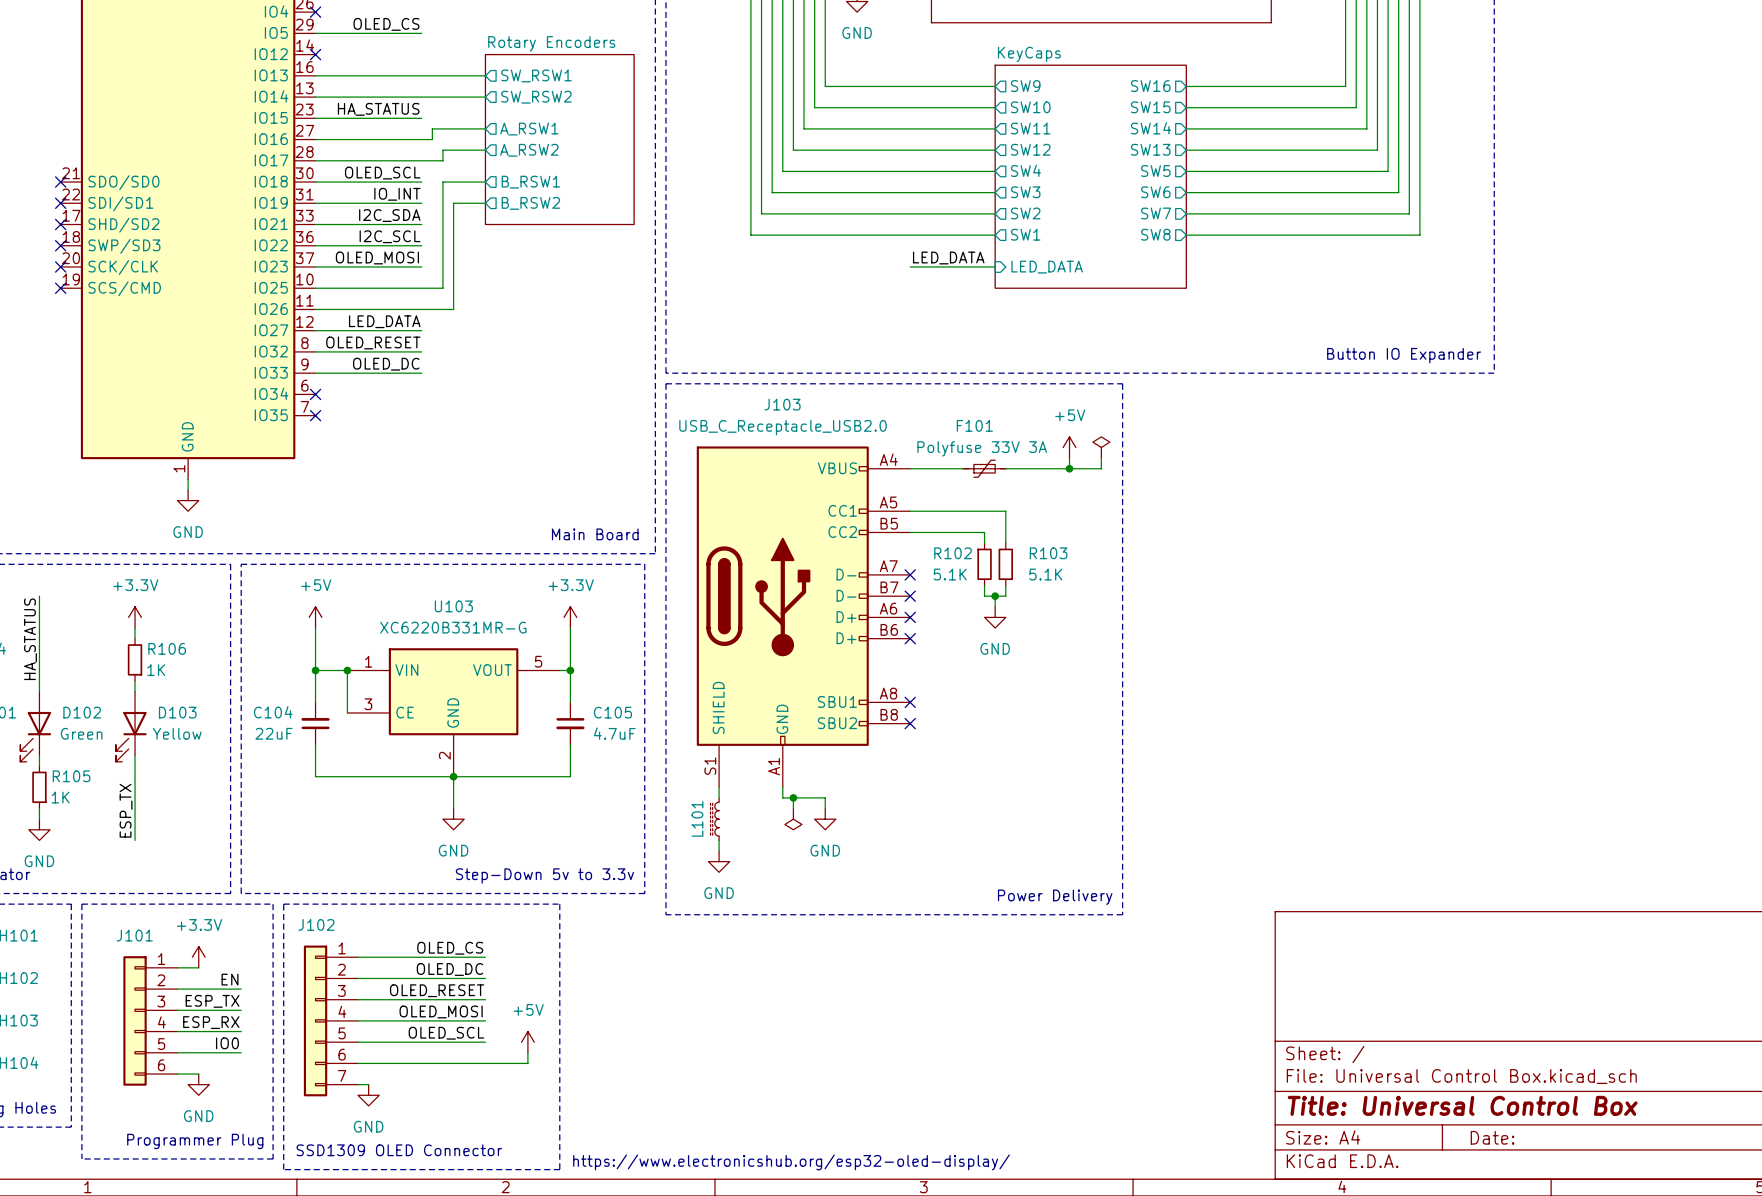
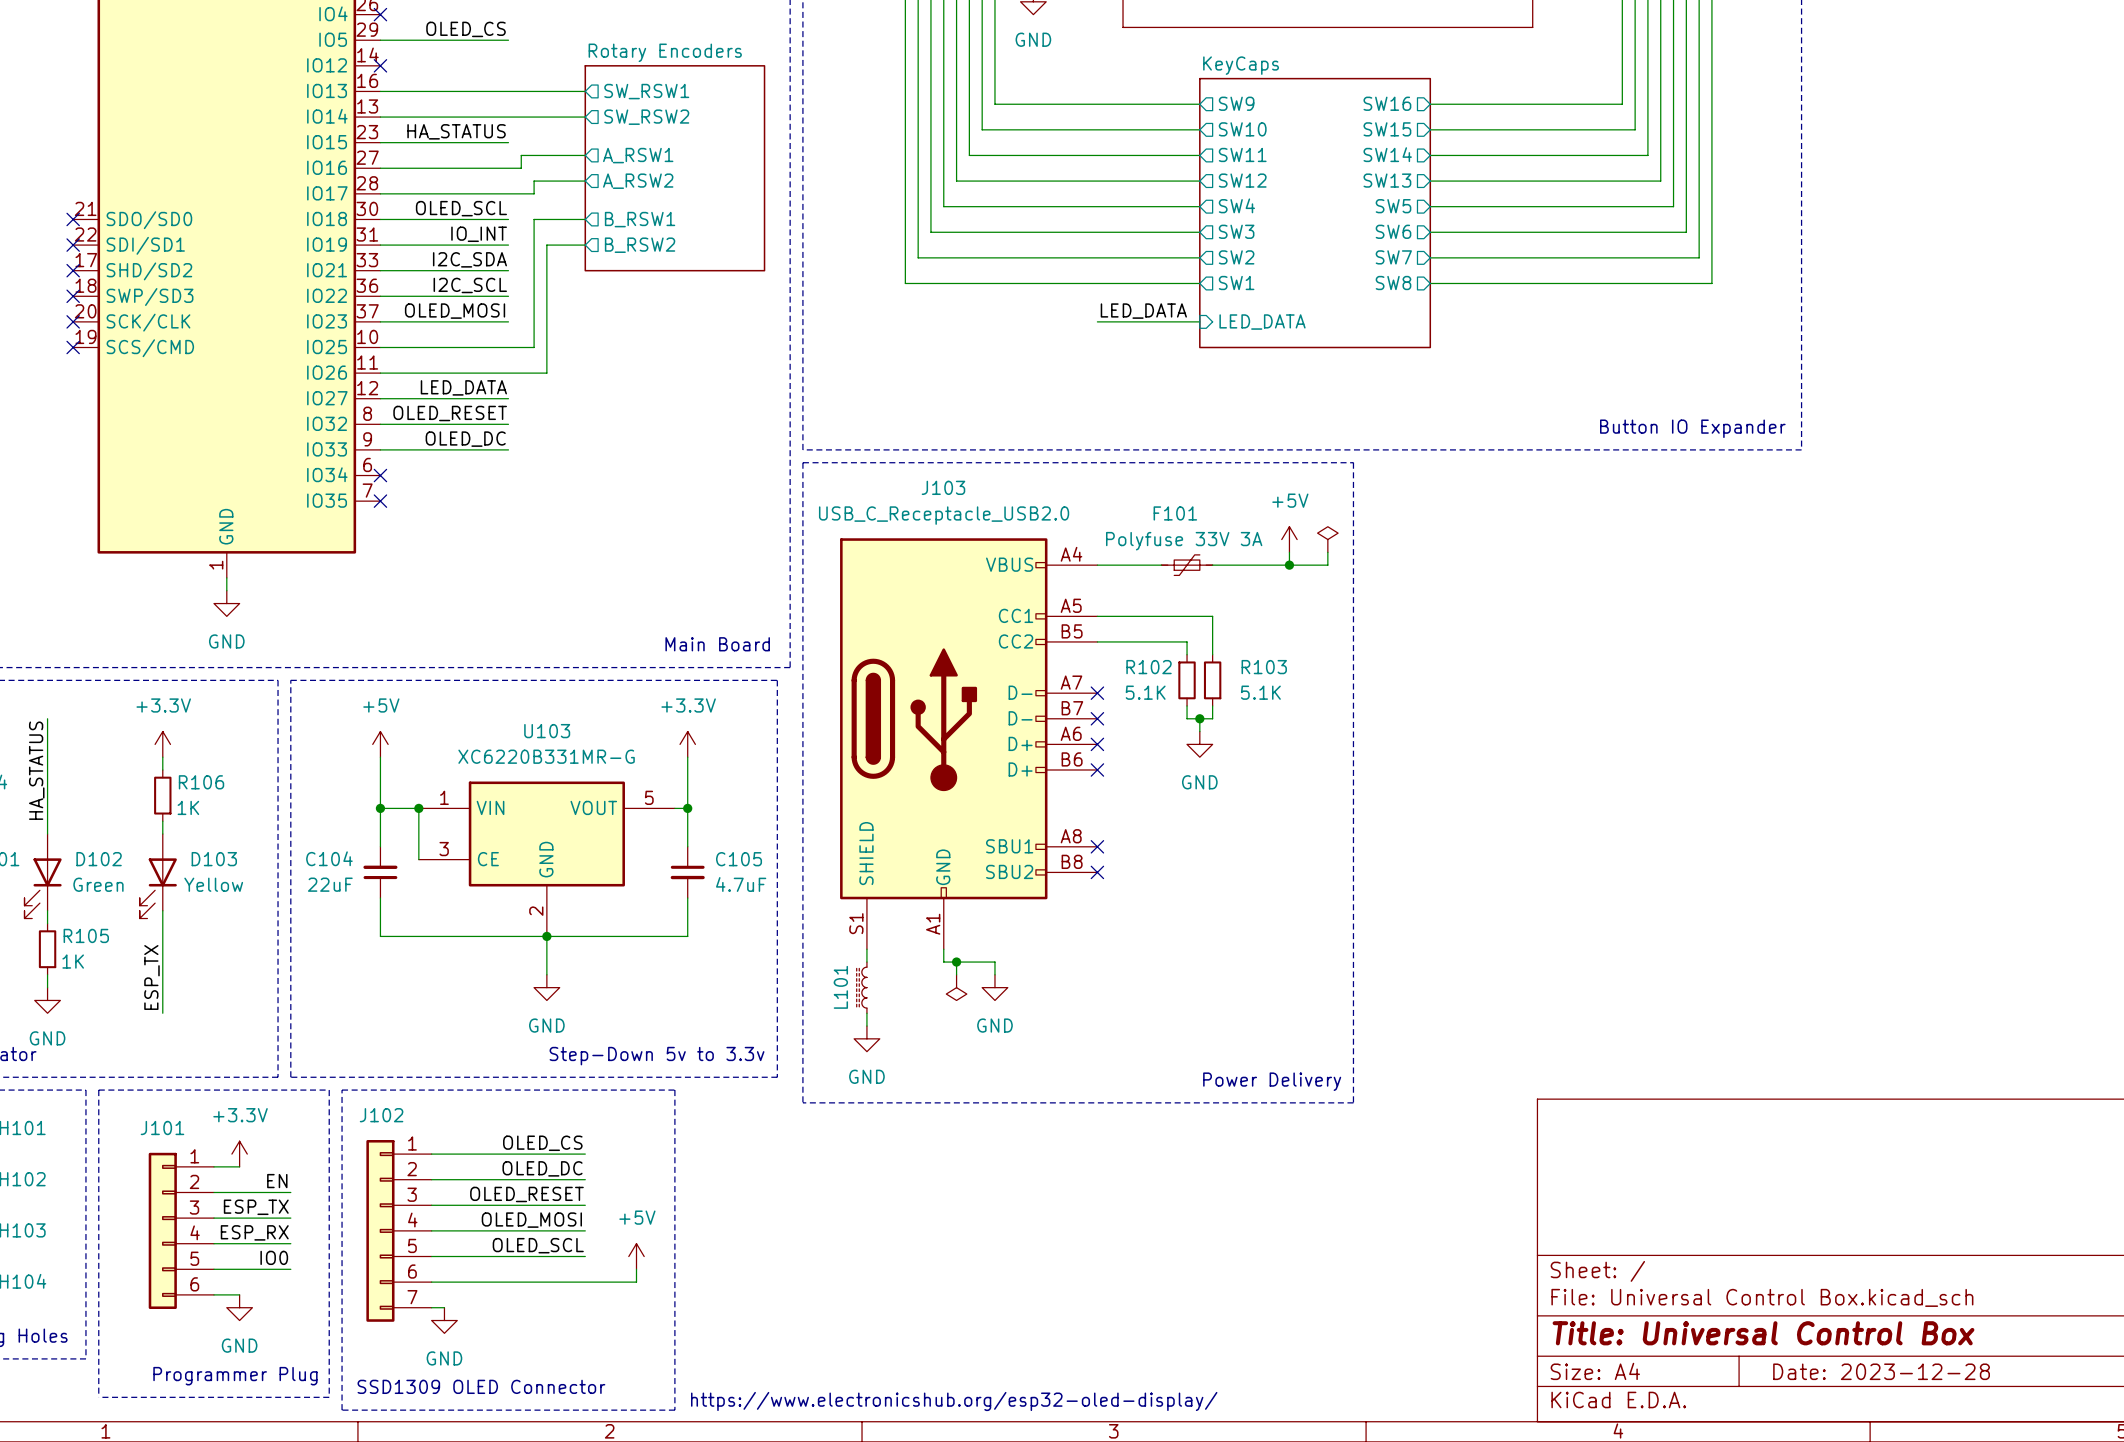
title block: Date: (1492, 1137) -> Date: 2023-12-28 (1881, 1371)

